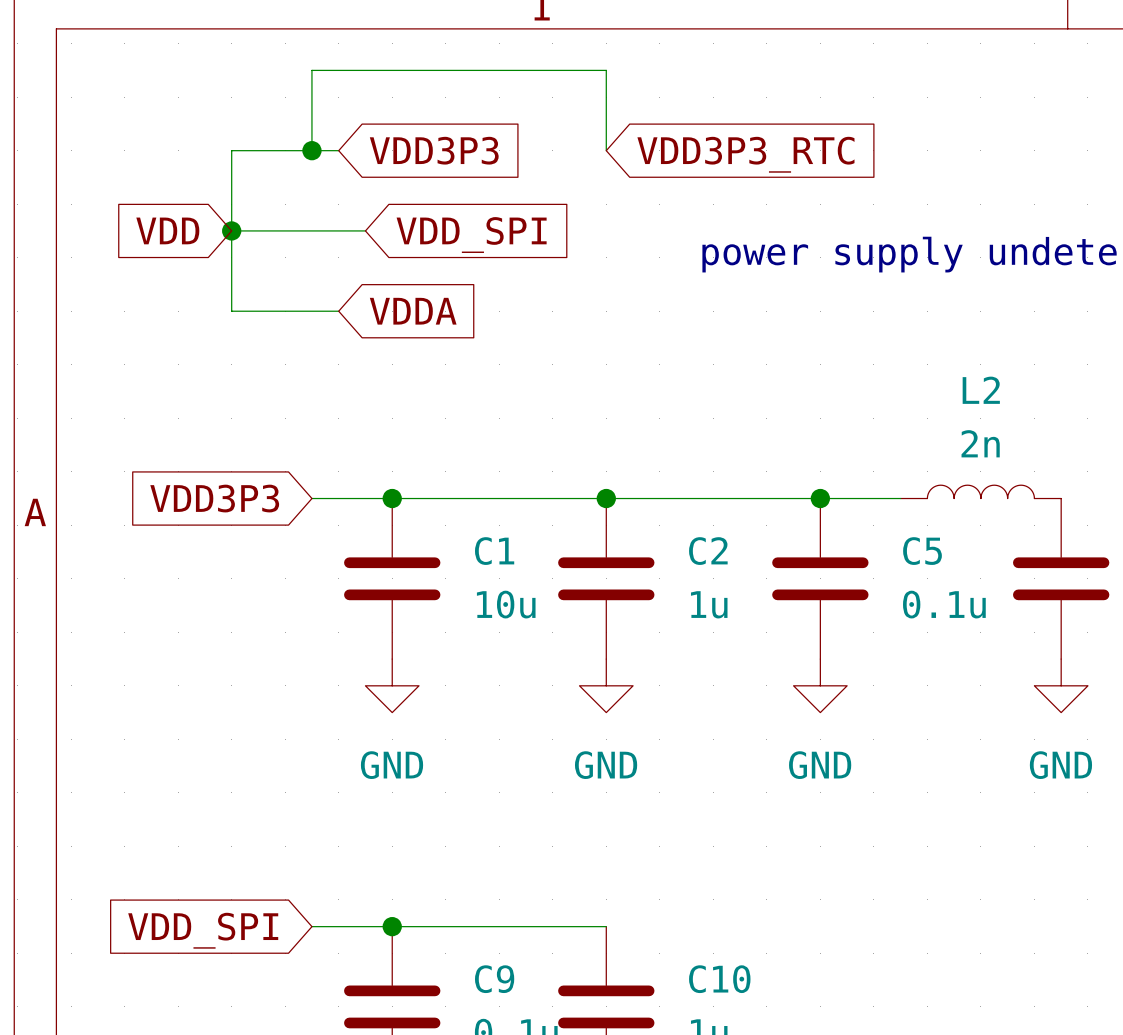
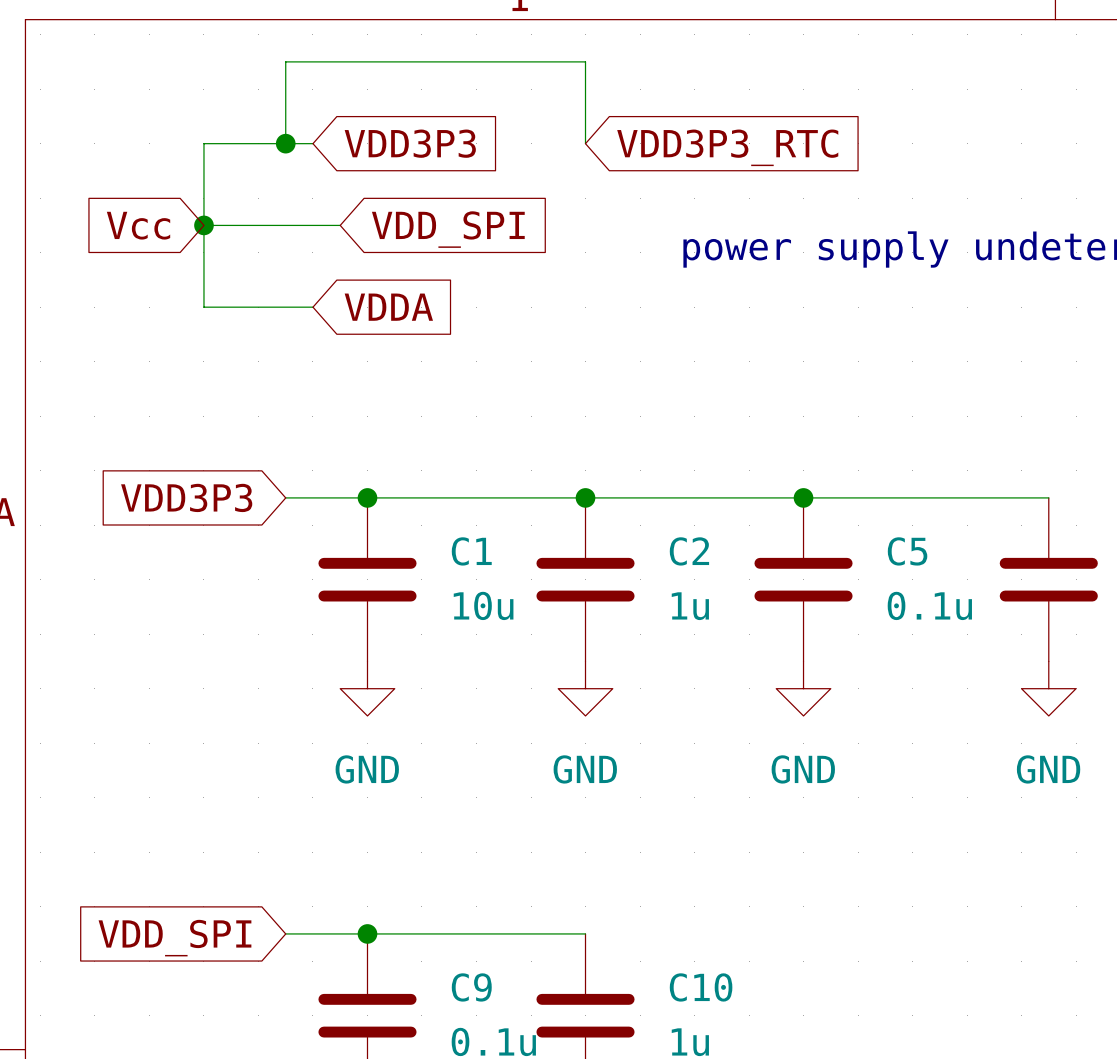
global label: VDD (167, 230) -> Vcc (138, 225)
L2: 2n (980, 491) -> none
wire: none -> (885, 497) (1048, 497)

